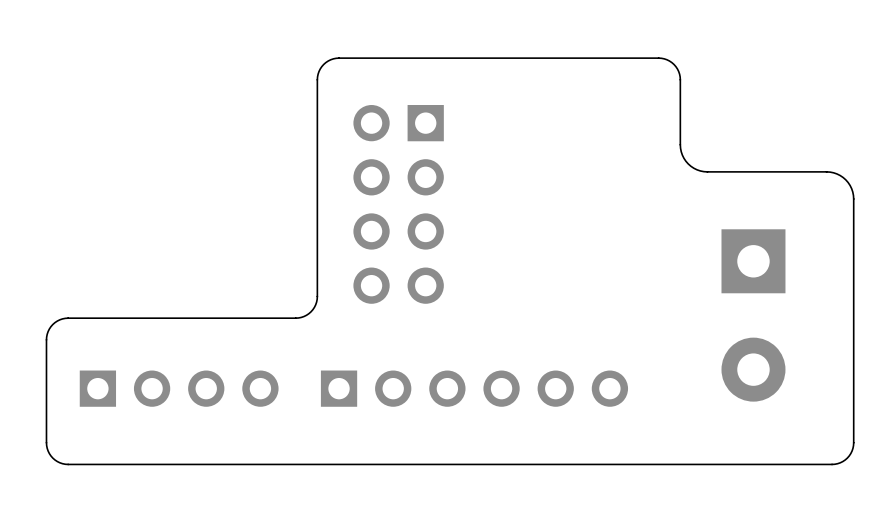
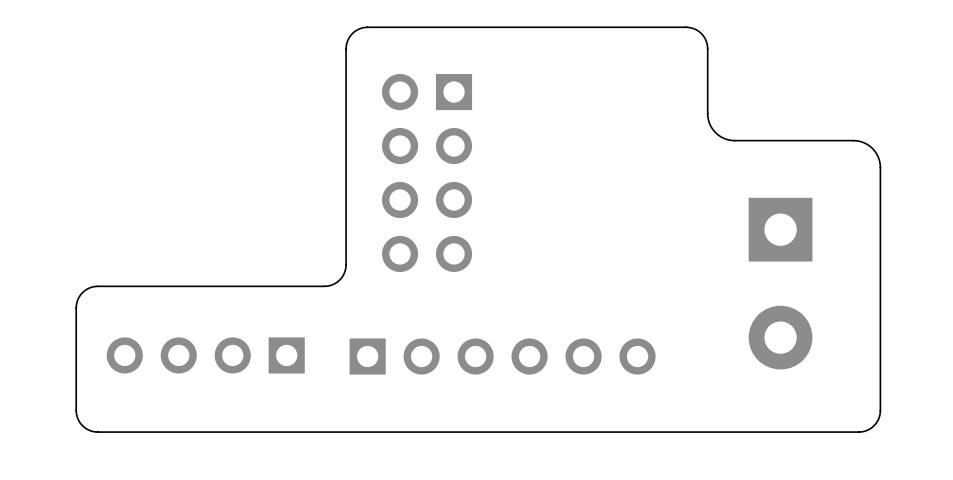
part rotation: 0° (179, 388) -> 180° (205, 355)

